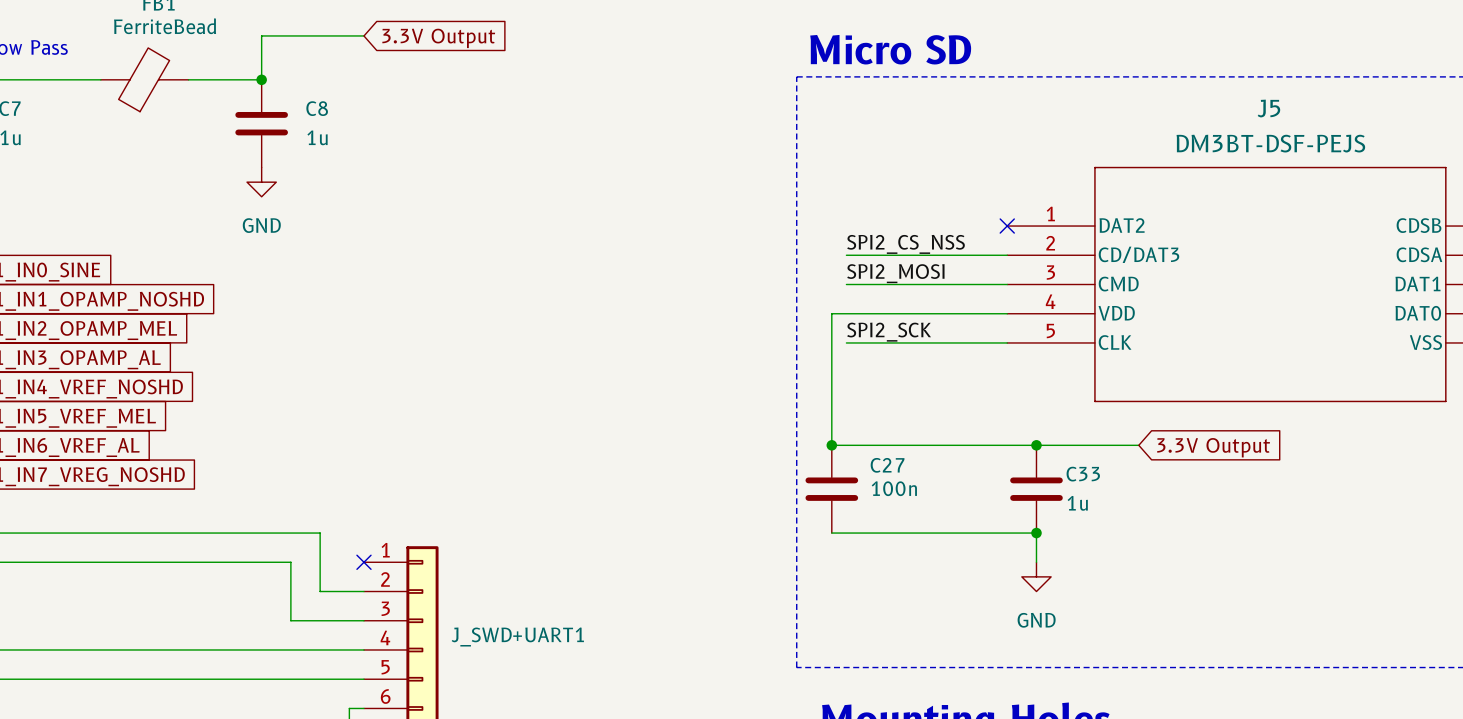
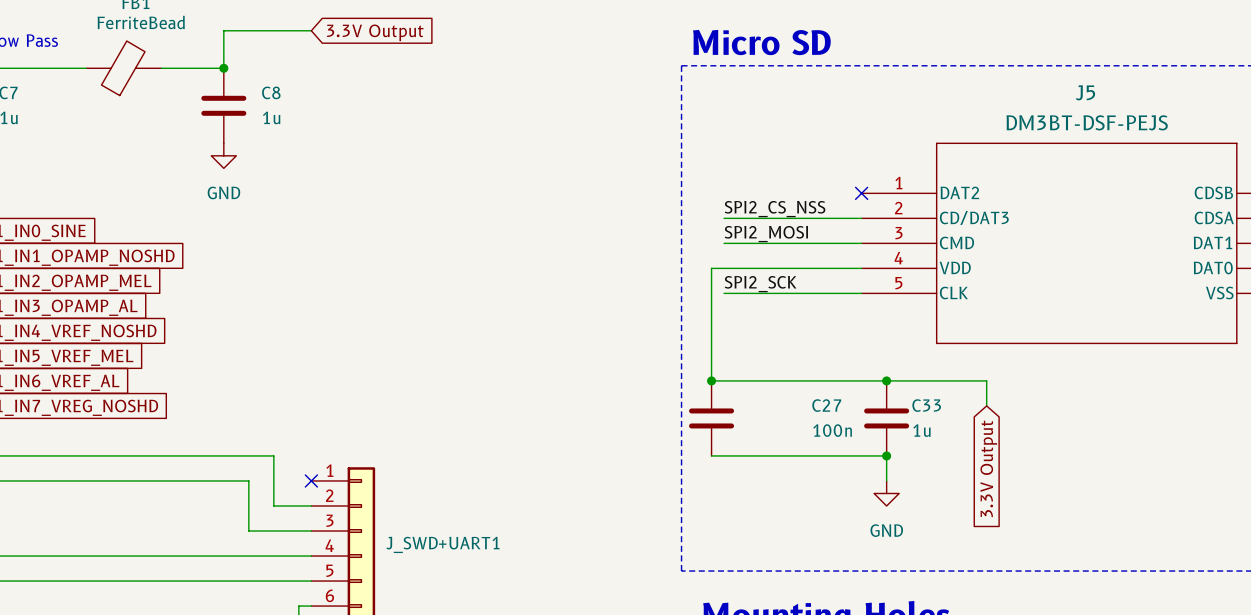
wire: none -> (974, 380) (986, 380) (986, 405)
global label rotation: 0° (1213, 447) -> 90° clockwise (988, 468)
C27 name position: C27 (887, 465) -> C27 (826, 405)
C27 value position: 100n (894, 488) -> 100n (832, 430)

